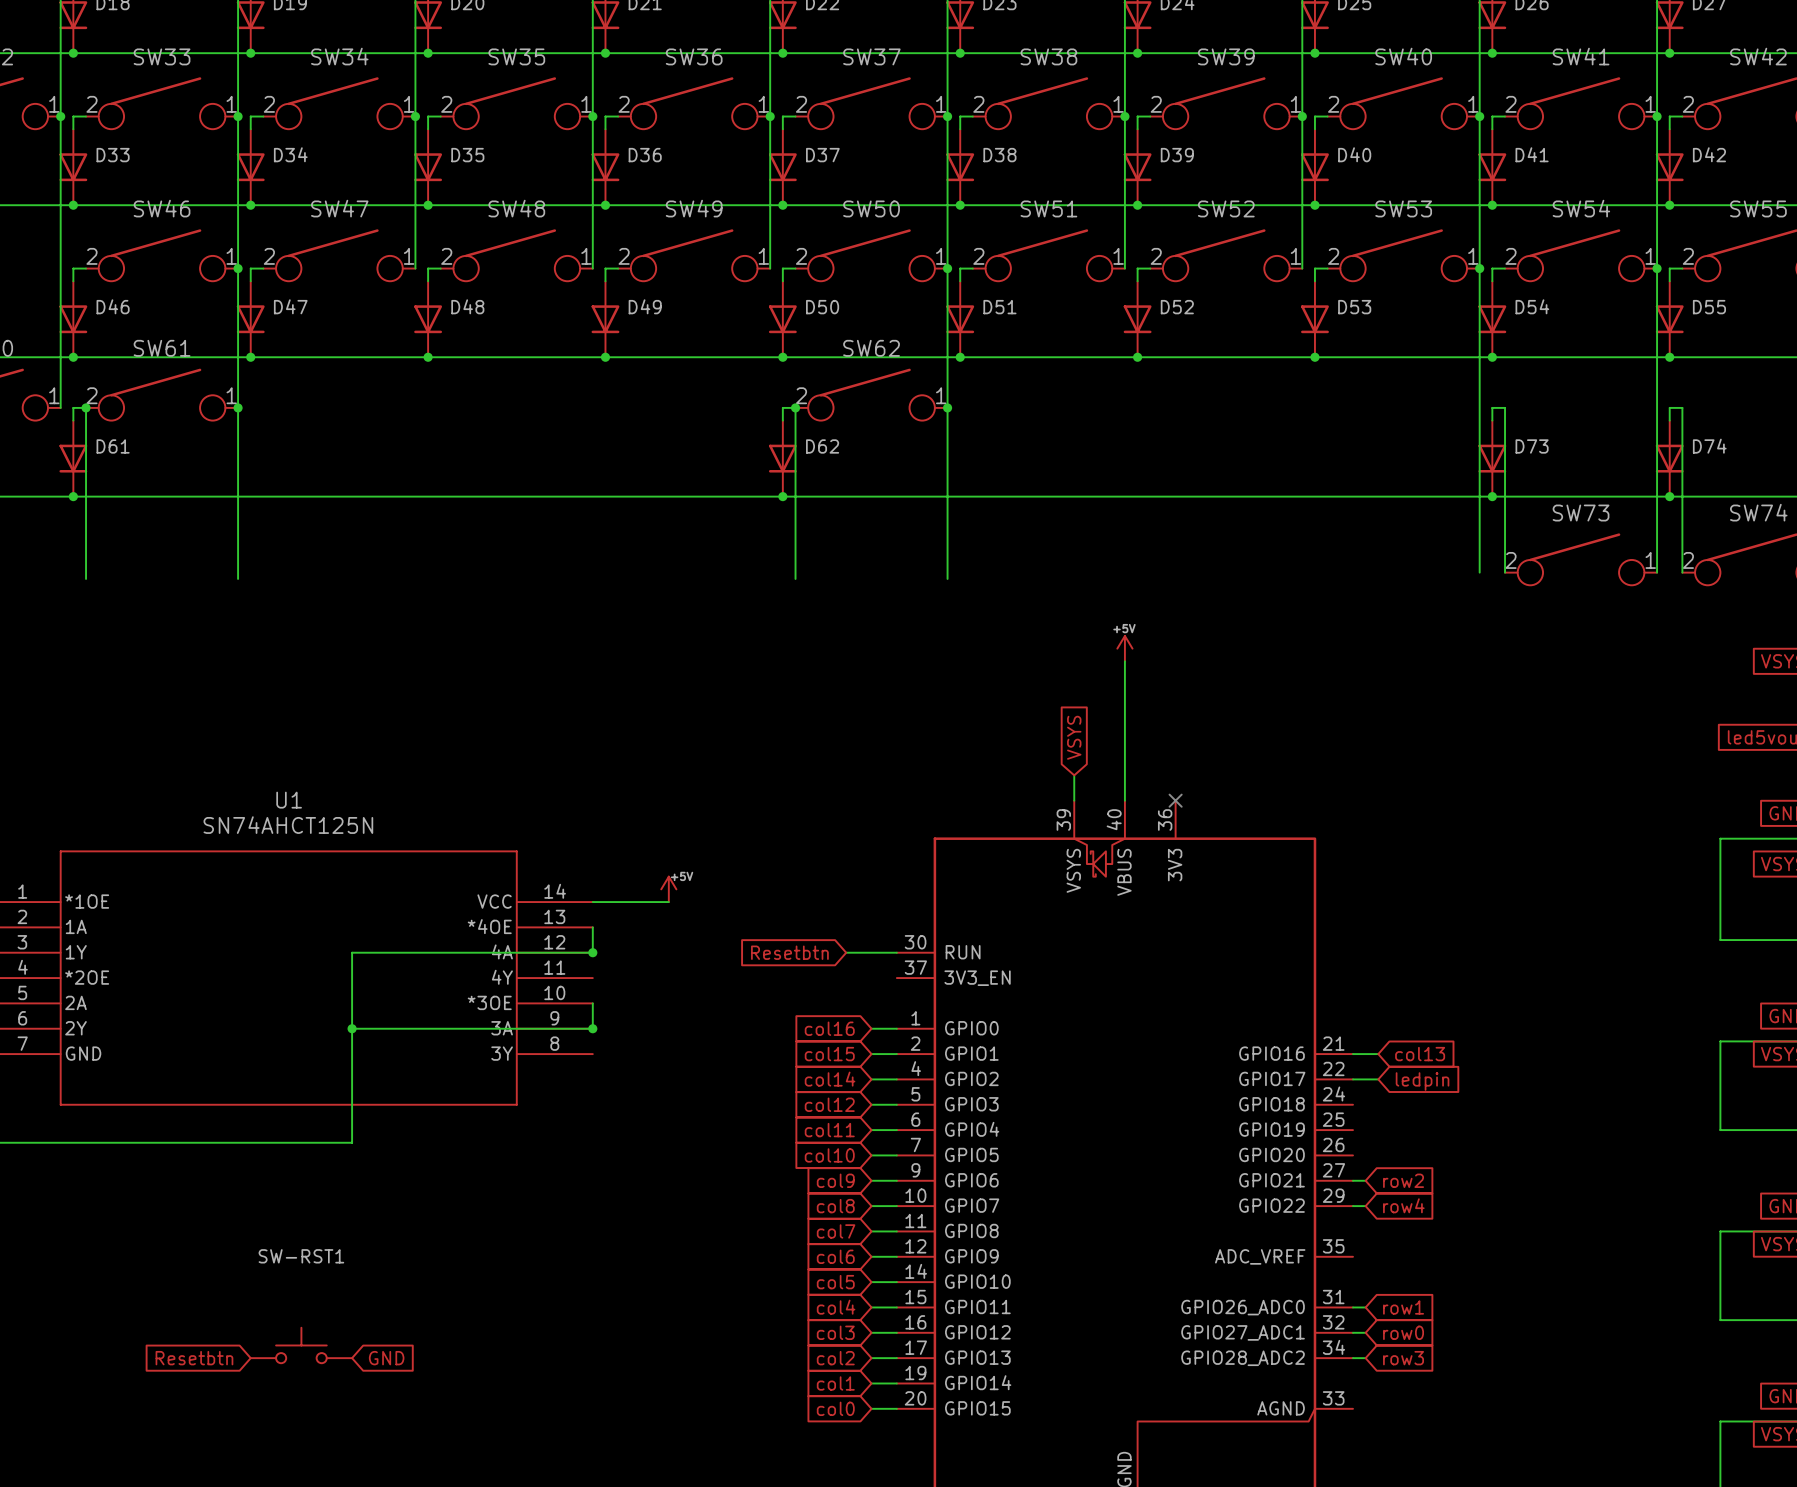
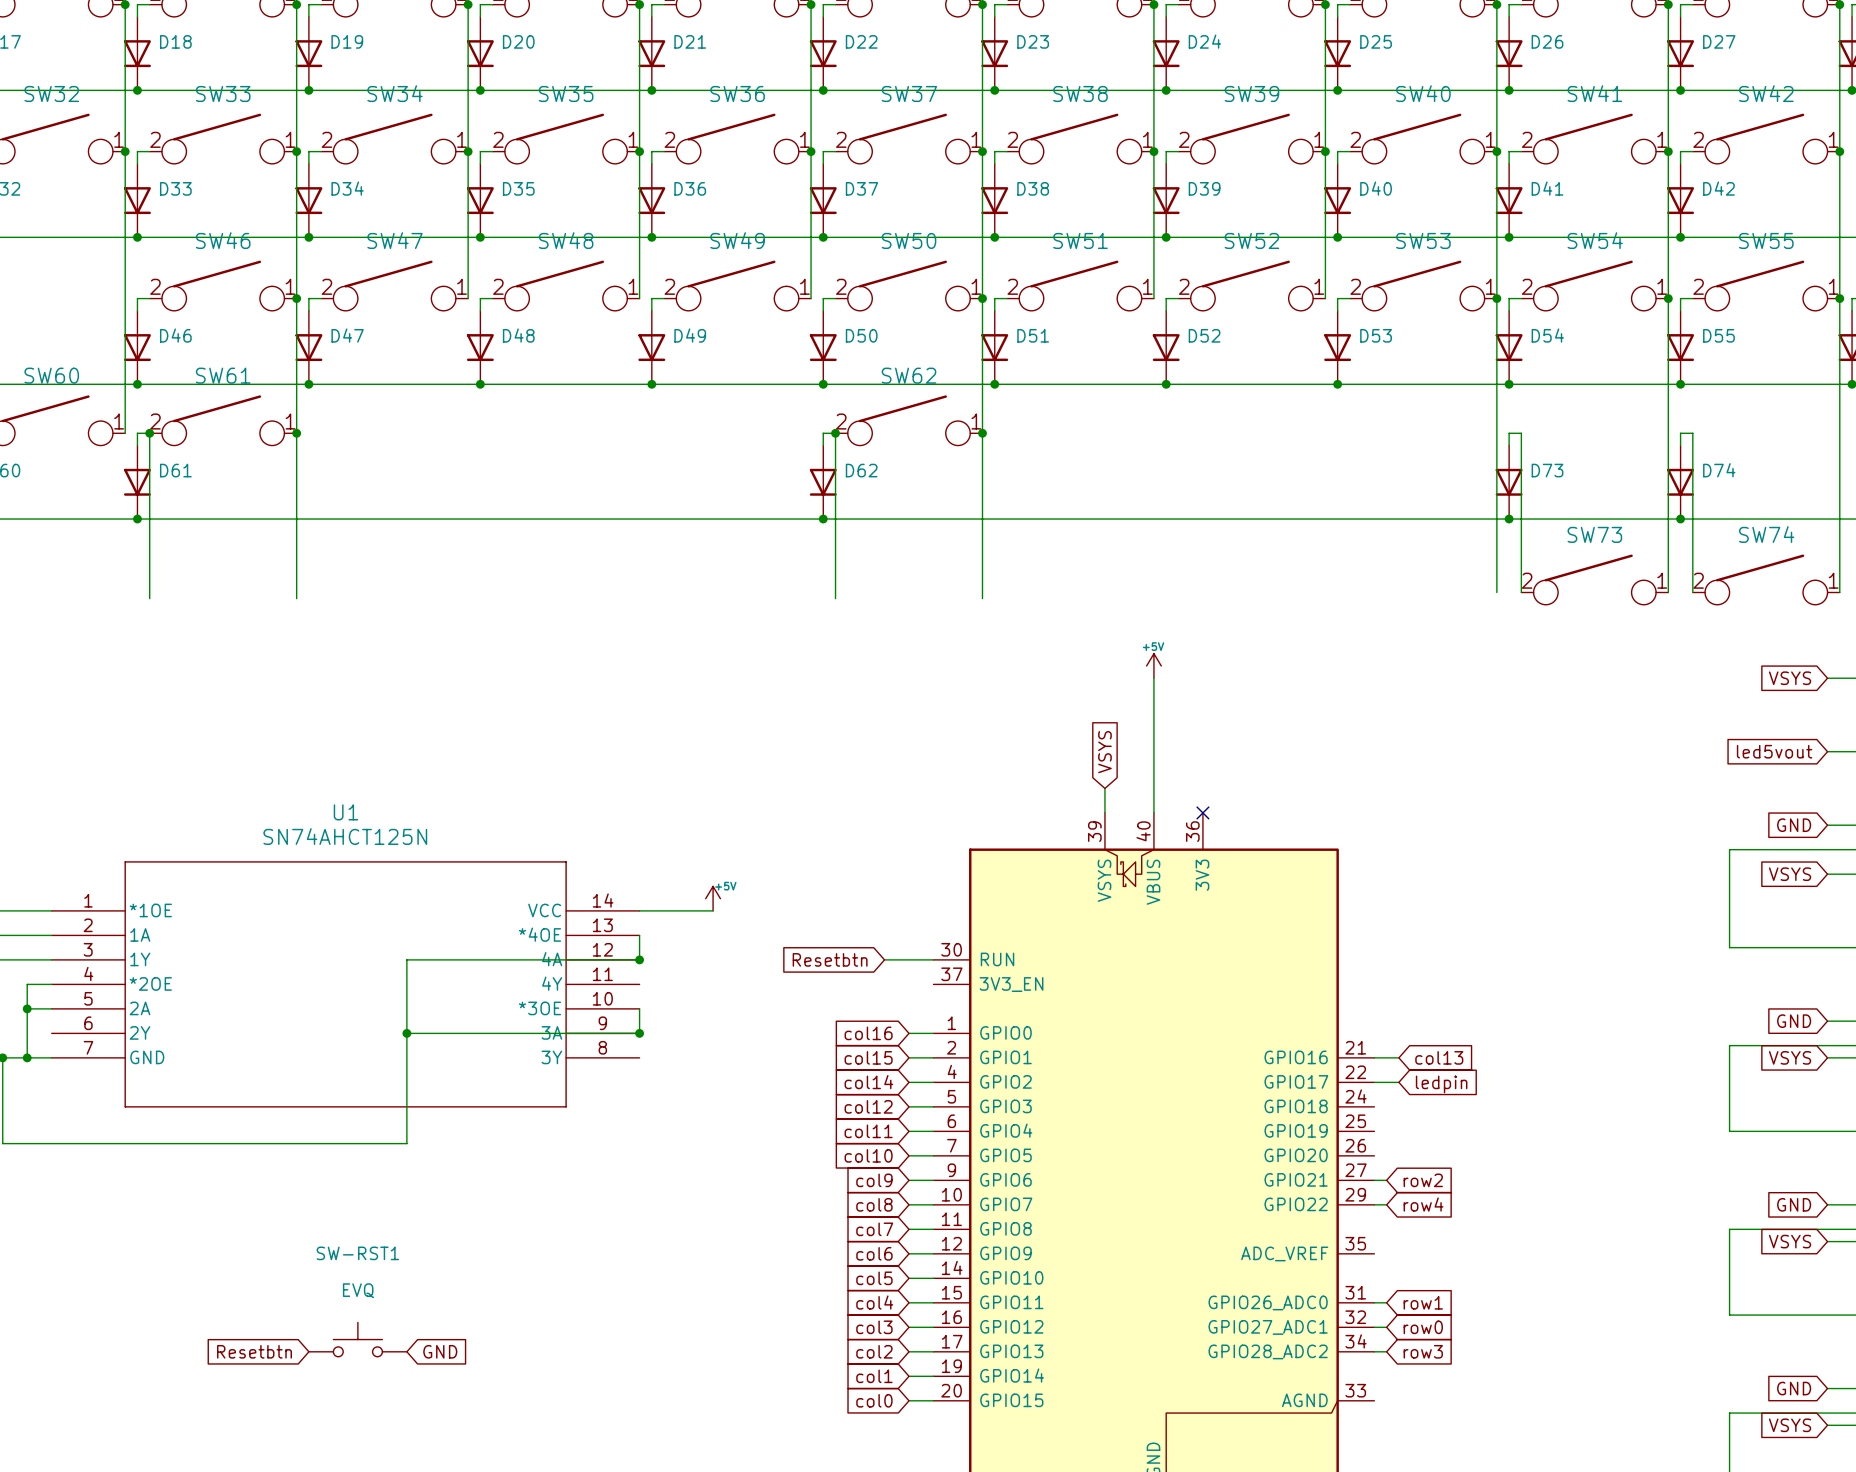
SW-RST1 value: none -> EVQ (358, 1290)

